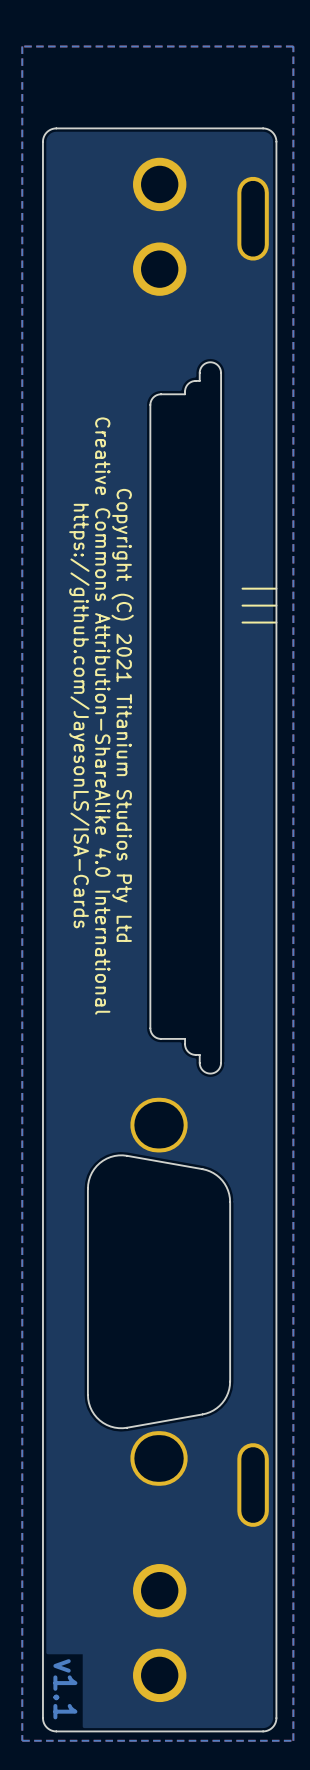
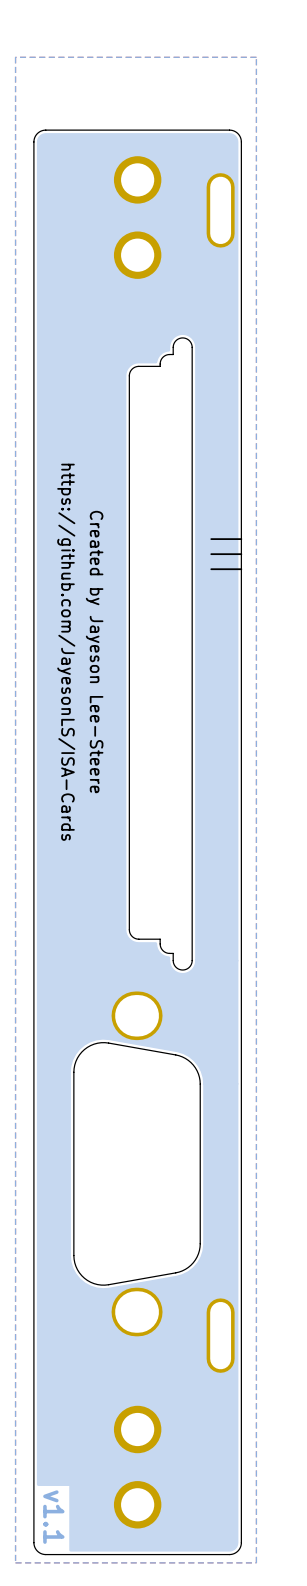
text: none -> Created by Jayeson Lee-Steere (94, 652)
text: Copyright (C) 2021 Titanium Studios Pty Ltd (122, 715) -> none
text: Creative Commons Attribution-ShareAlike 4.0 International (103, 716) -> none

